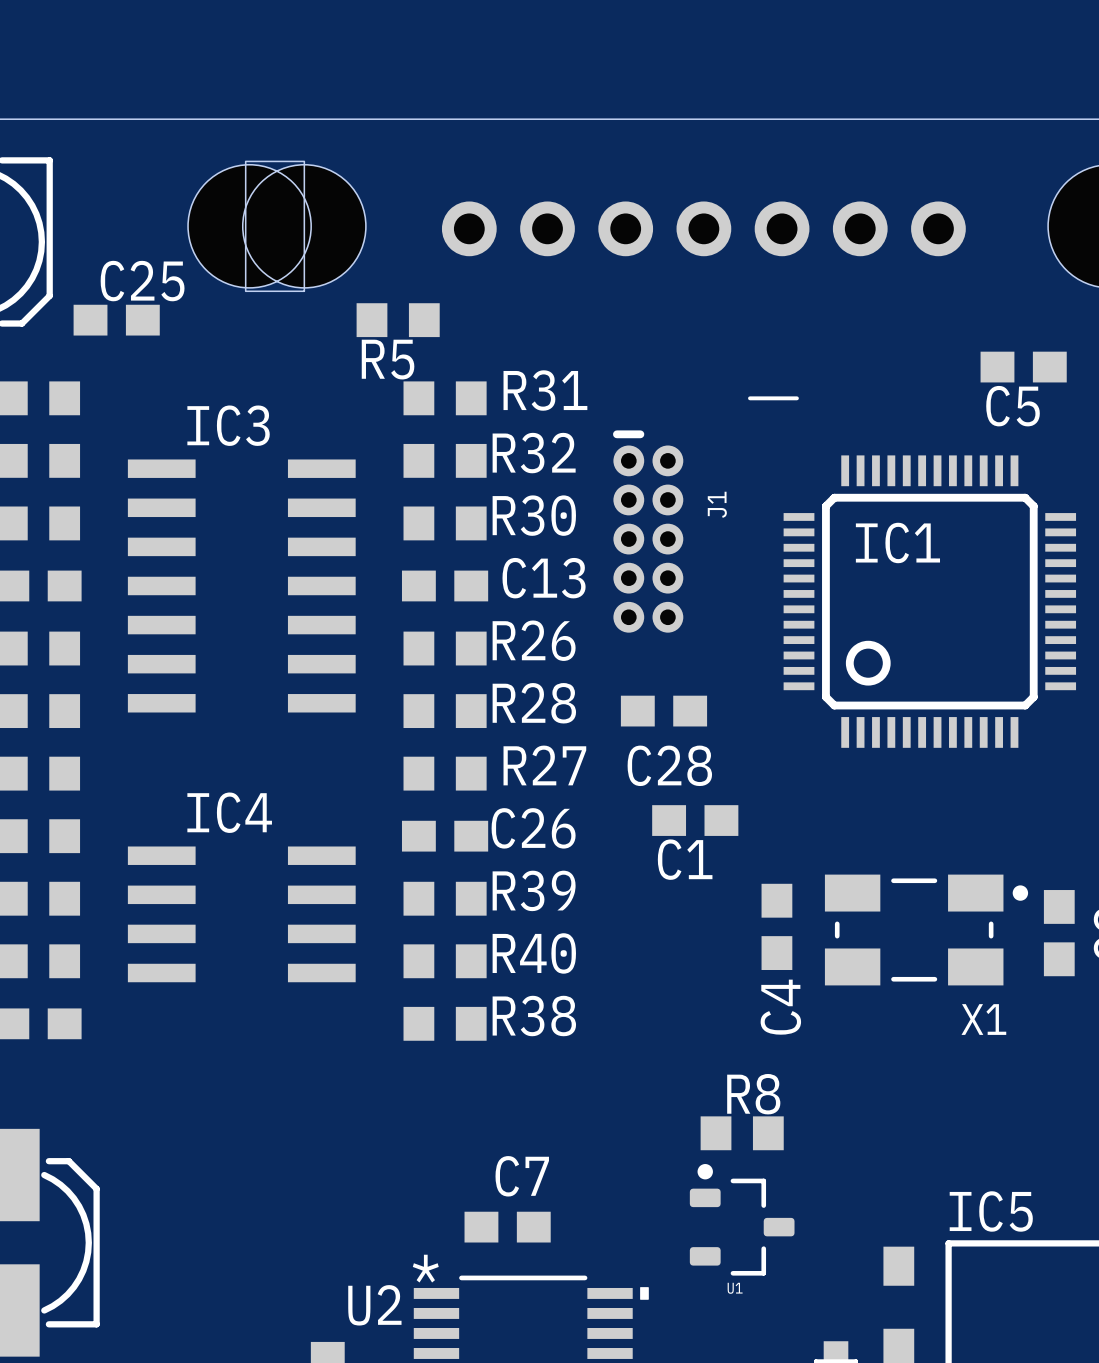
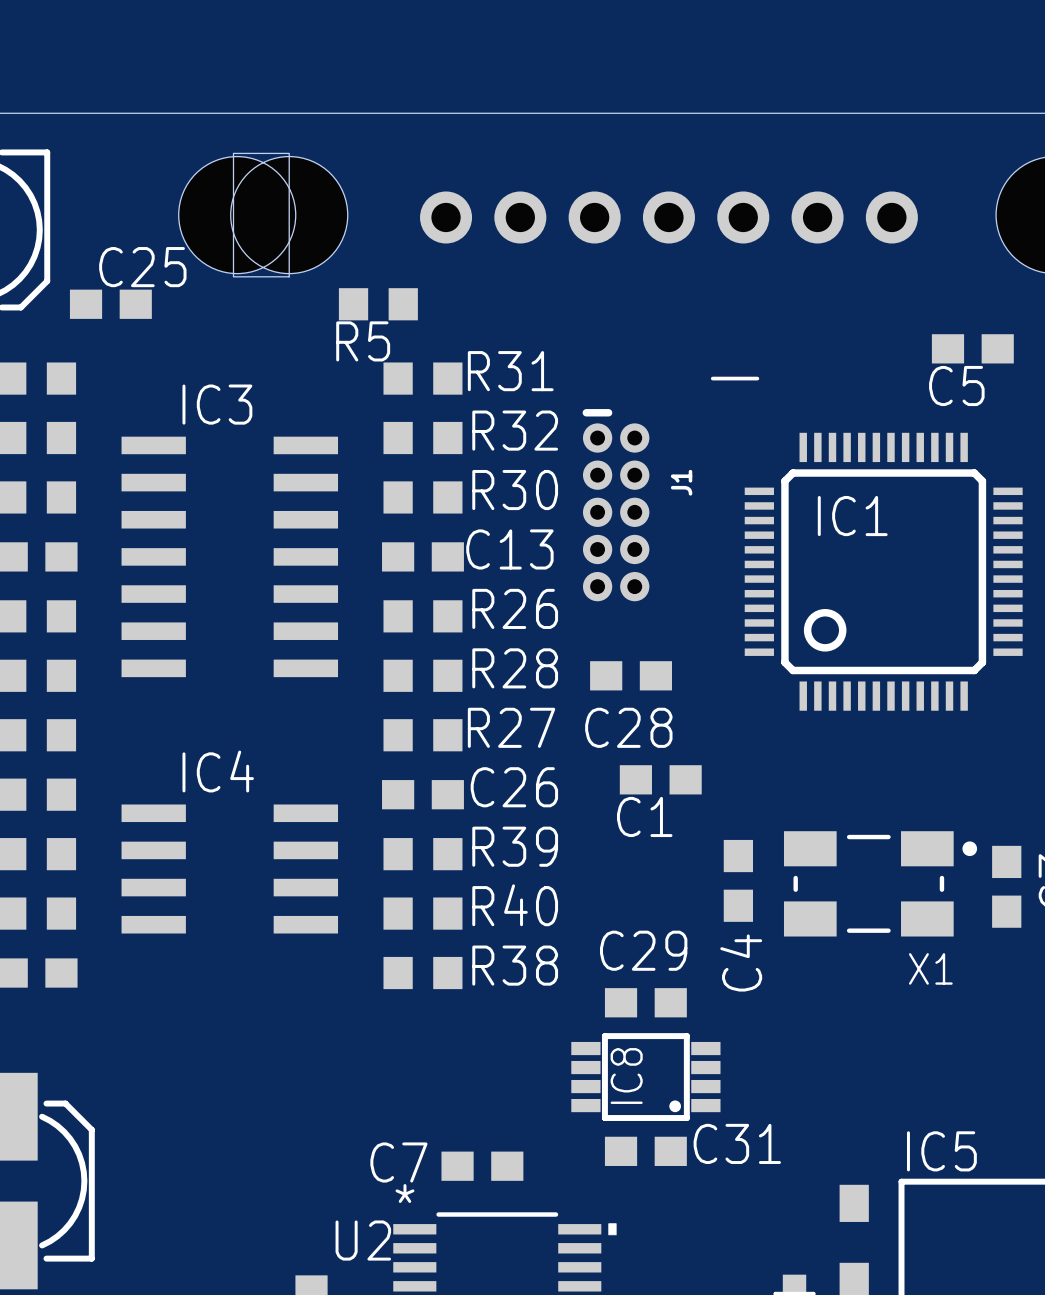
C29: none -> (645, 1002)
IC8: none -> (645, 1077)
R8: (742, 1133) -> none
C7 name position: C7 (522, 1176) -> C7 (398, 1162)
C31: none -> (645, 1151)
U1: (742, 1219) -> none

